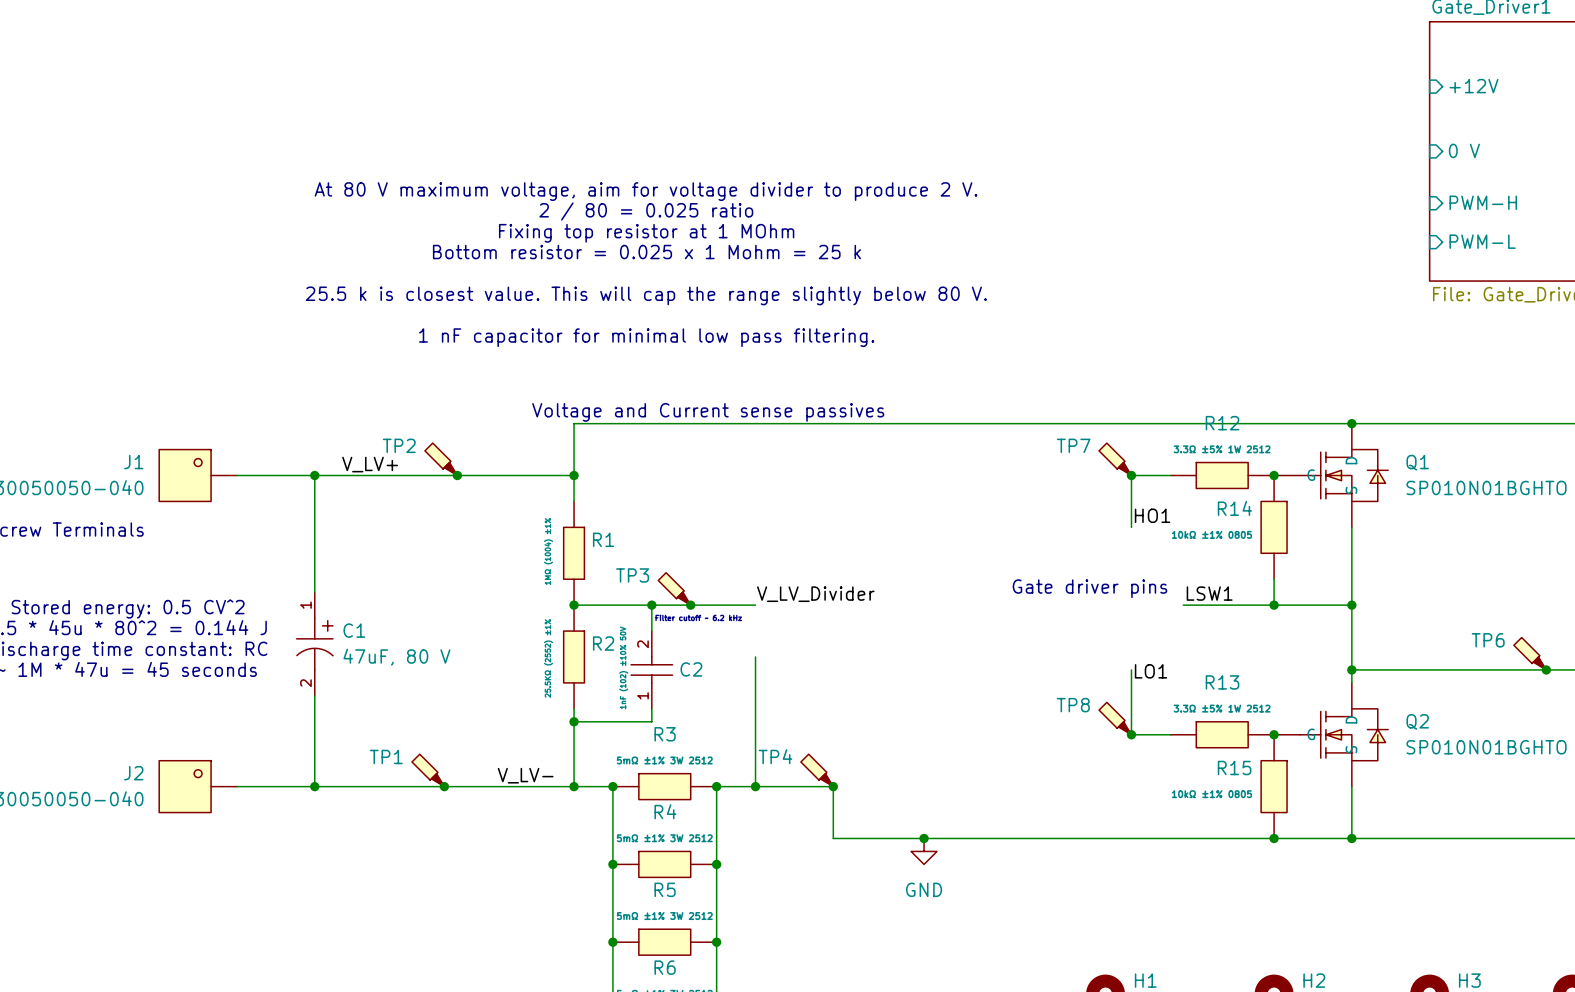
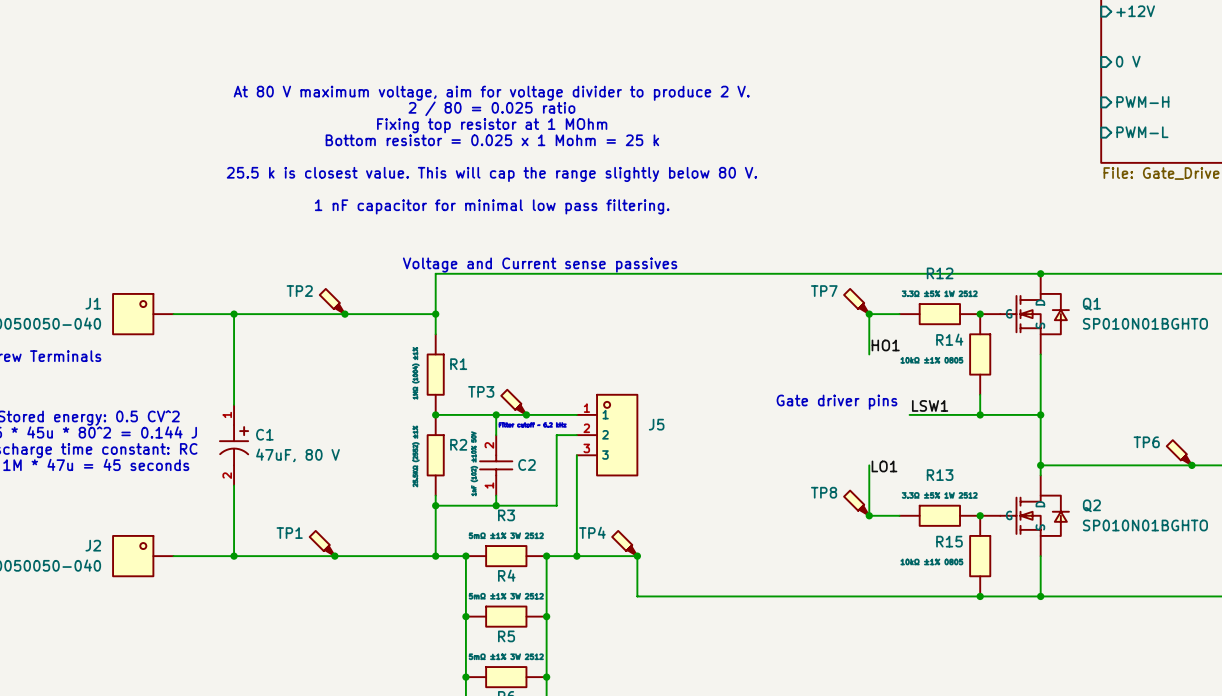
label: V_LV+ (370, 464) -> none
label: V_LV_Divider (815, 594) -> none
wire: none -> (576, 435) (556, 435) (556, 505) (496, 505)
J5: none -> (607, 435)
junction: none -> (496, 505)
label: V_LV- (525, 775) -> none
junction: (924, 838) -> none
power symbol: GND (924, 851) -> none

